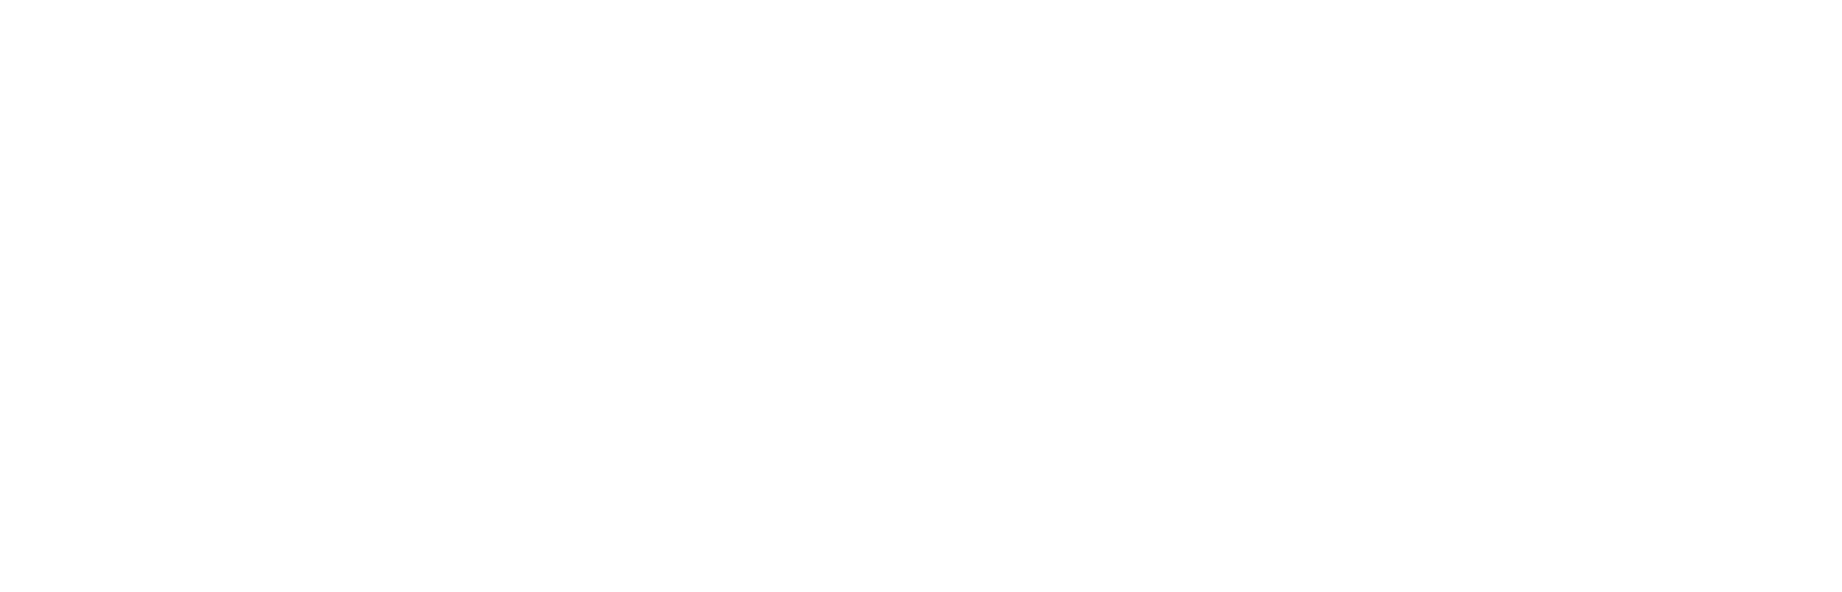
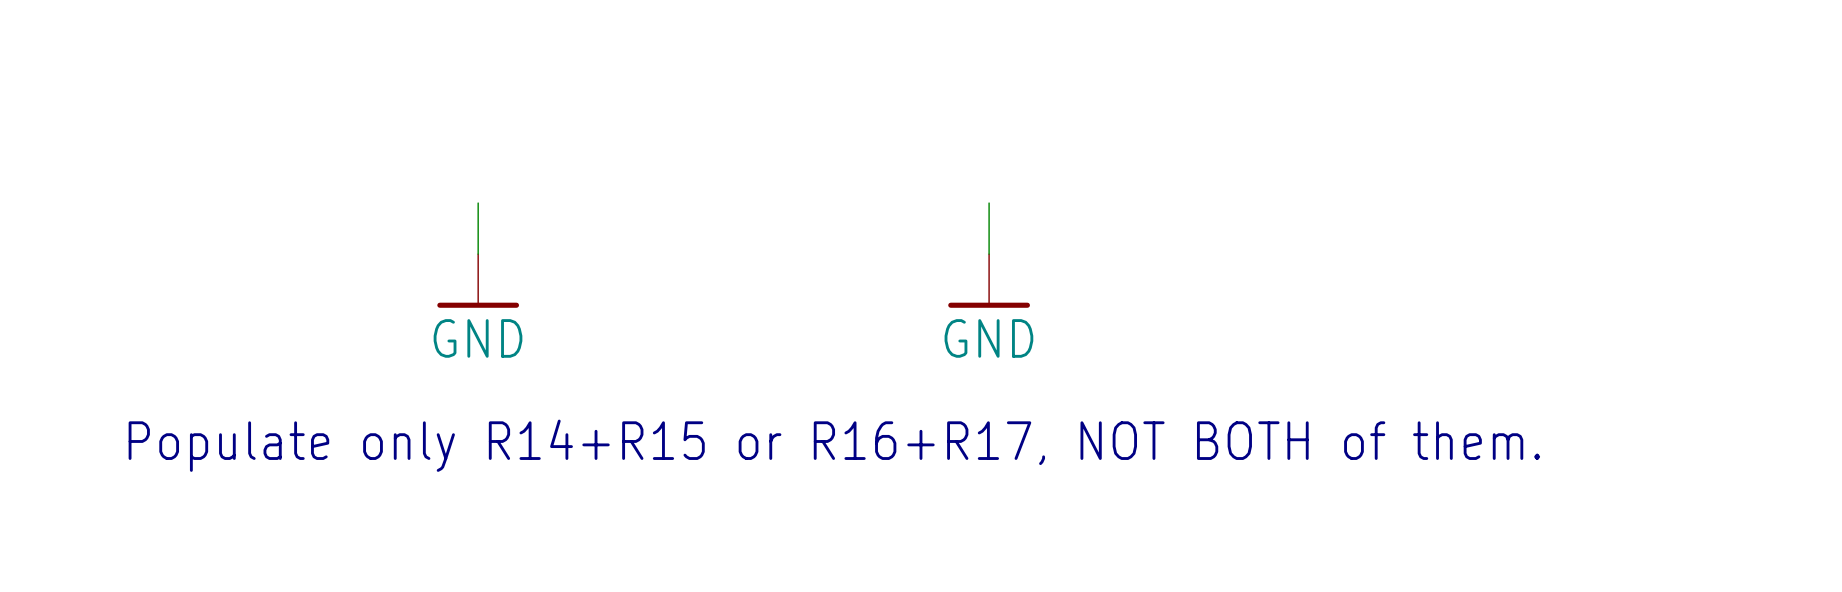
wire: none -> (478, 203) (478, 254)
wire: none -> (989, 203) (989, 254)
power symbol: none -> GND (478, 280)
power symbol: none -> GND (989, 280)
text: none -> Populate only R14+R15 or R16+R17, NOT BOTH of them. (834, 445)

